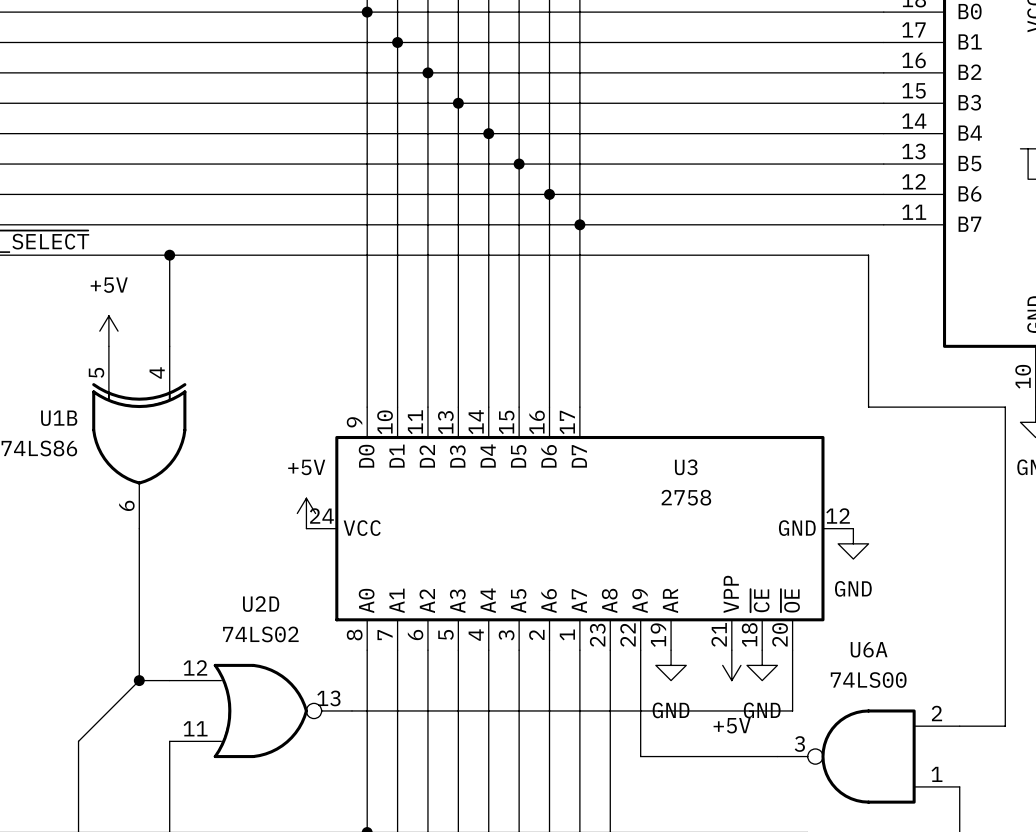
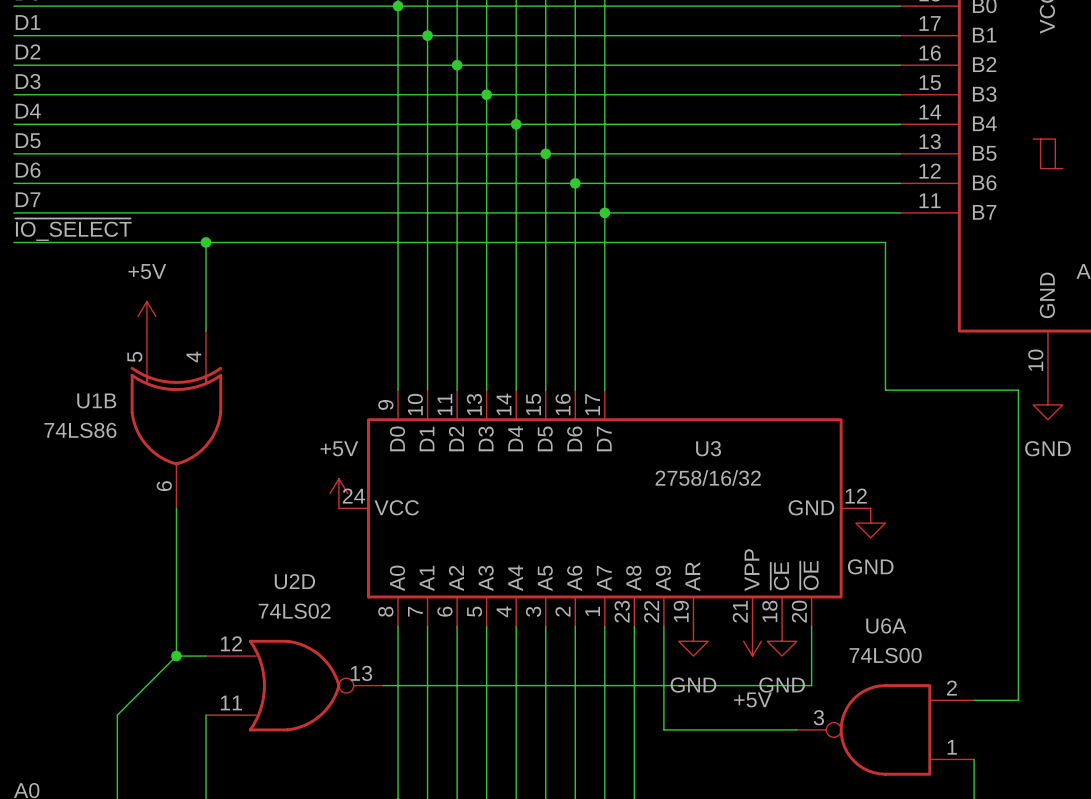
U3 value: 2758 (686, 497) -> 2758/16/32 (708, 477)

